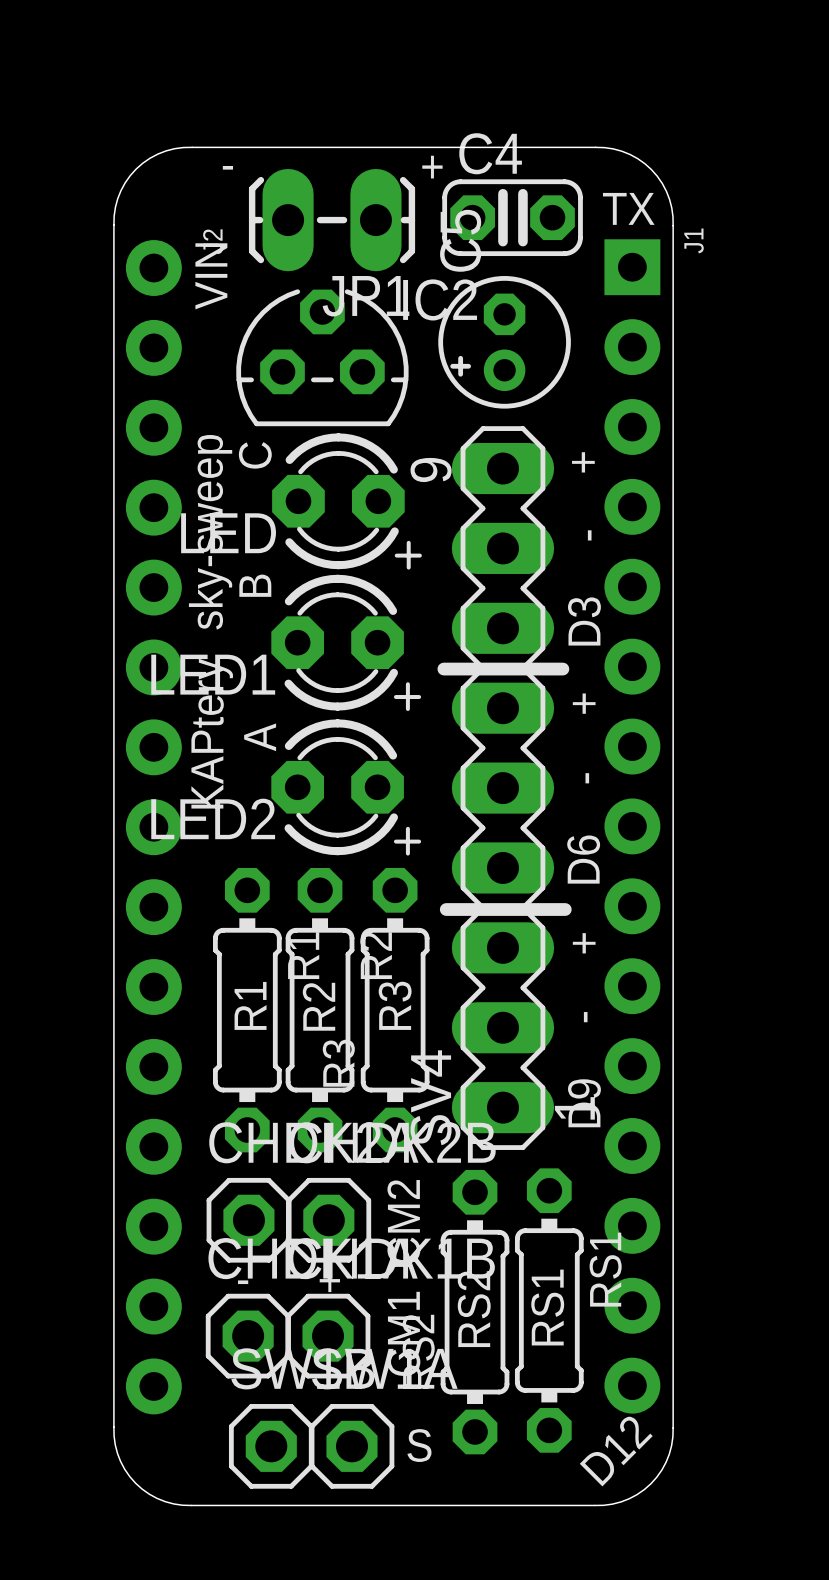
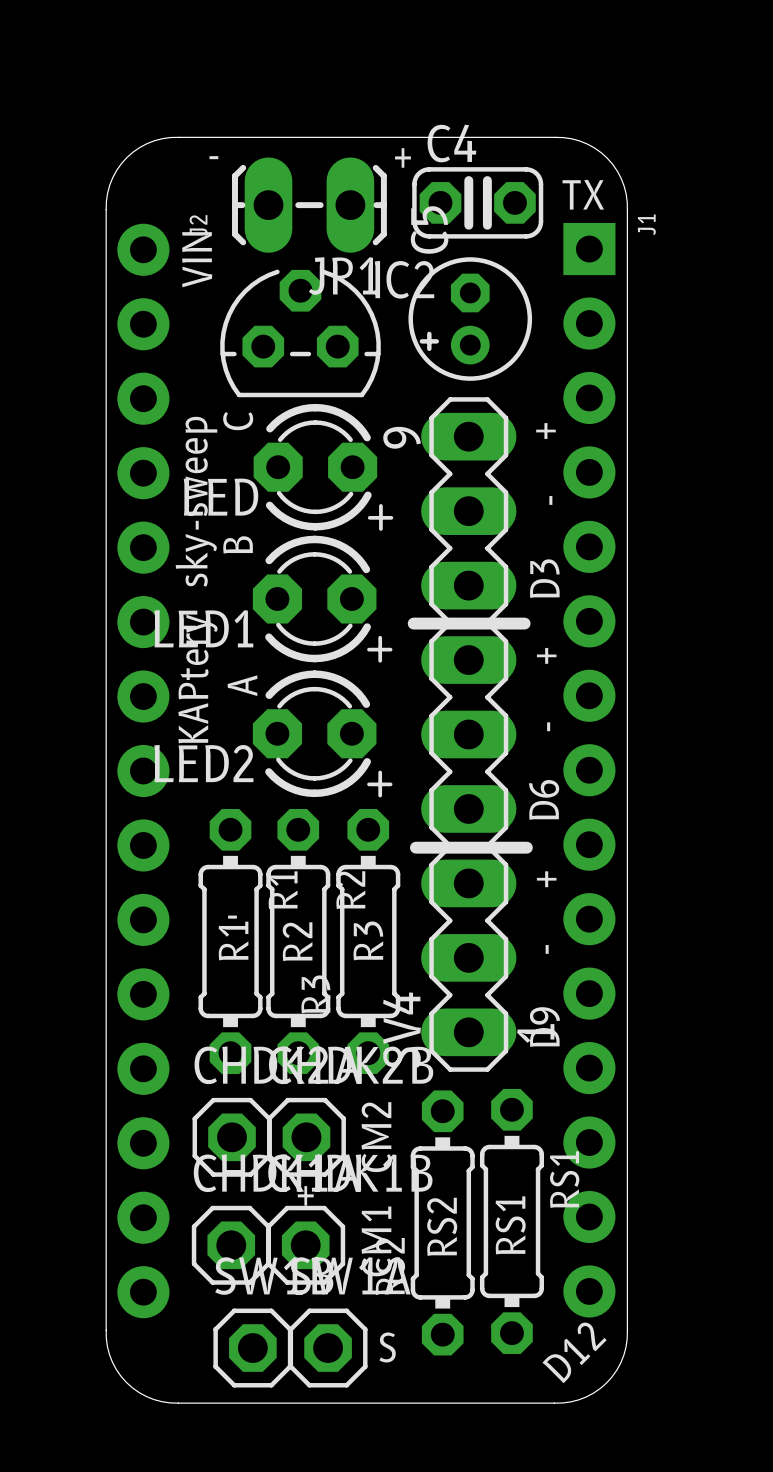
text position: - (243, 1282) -> - (232, 917)

